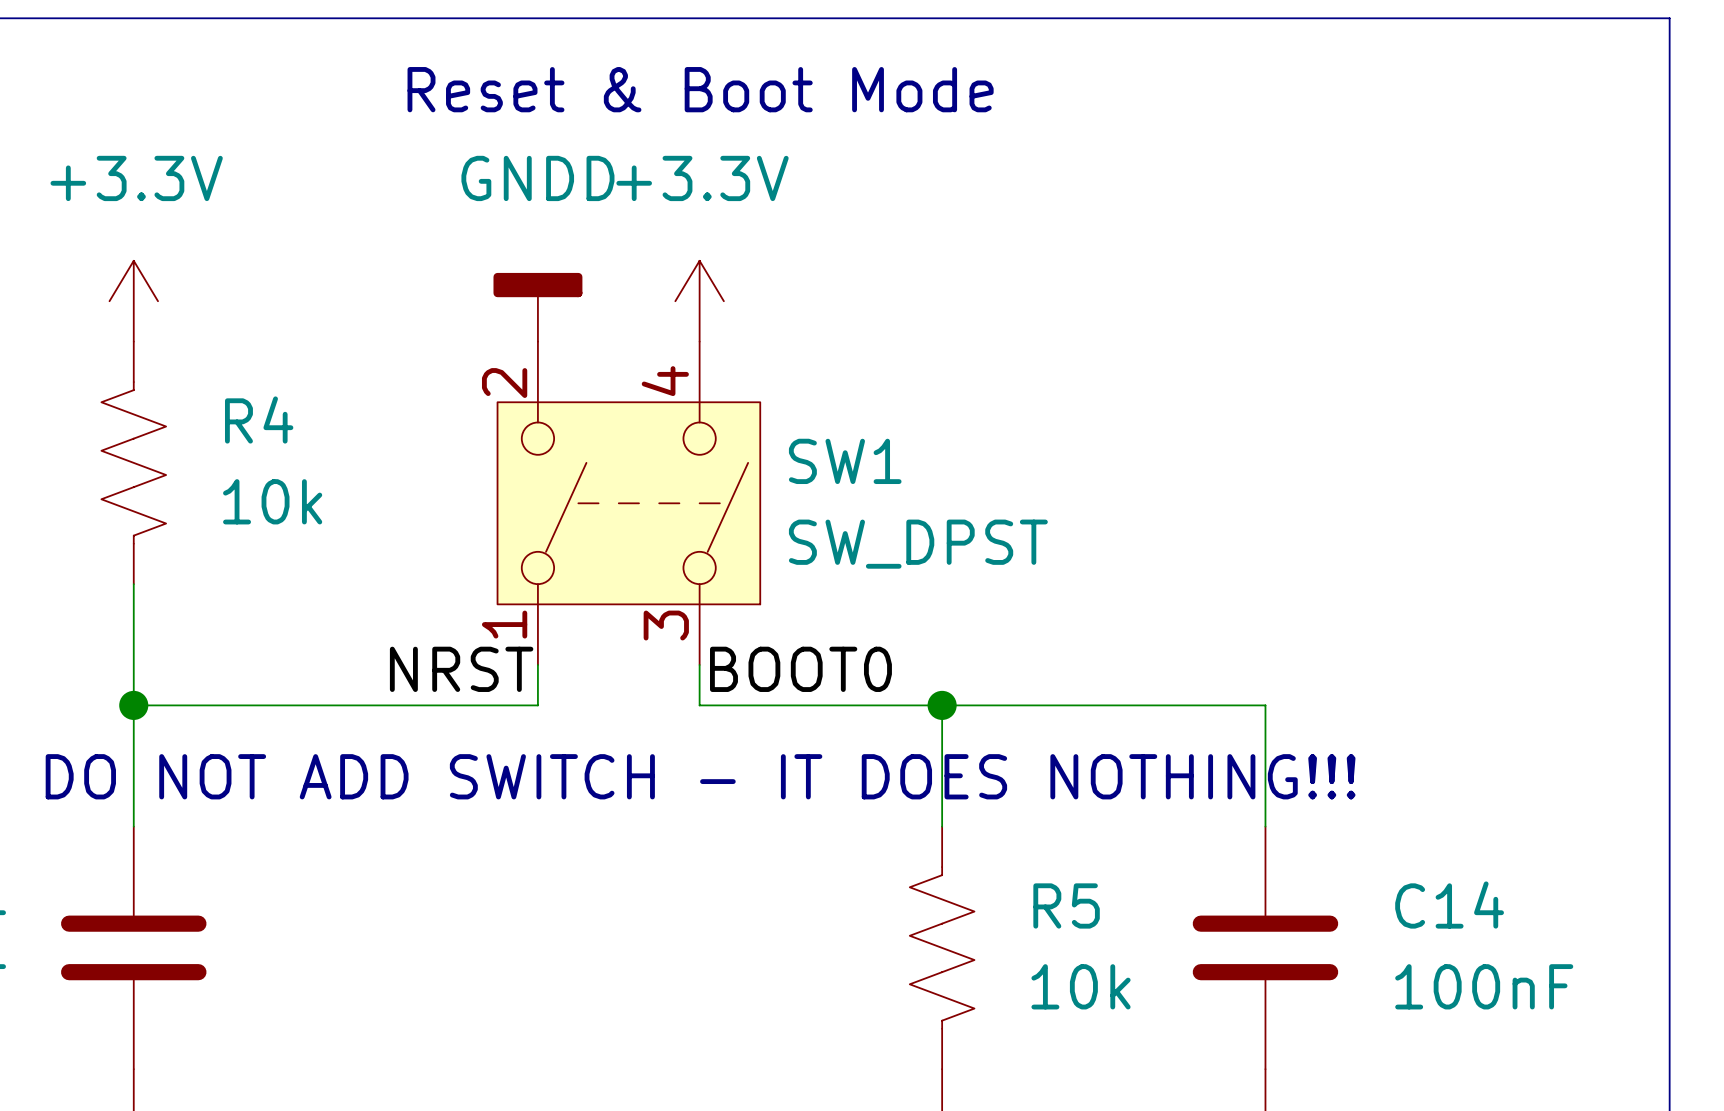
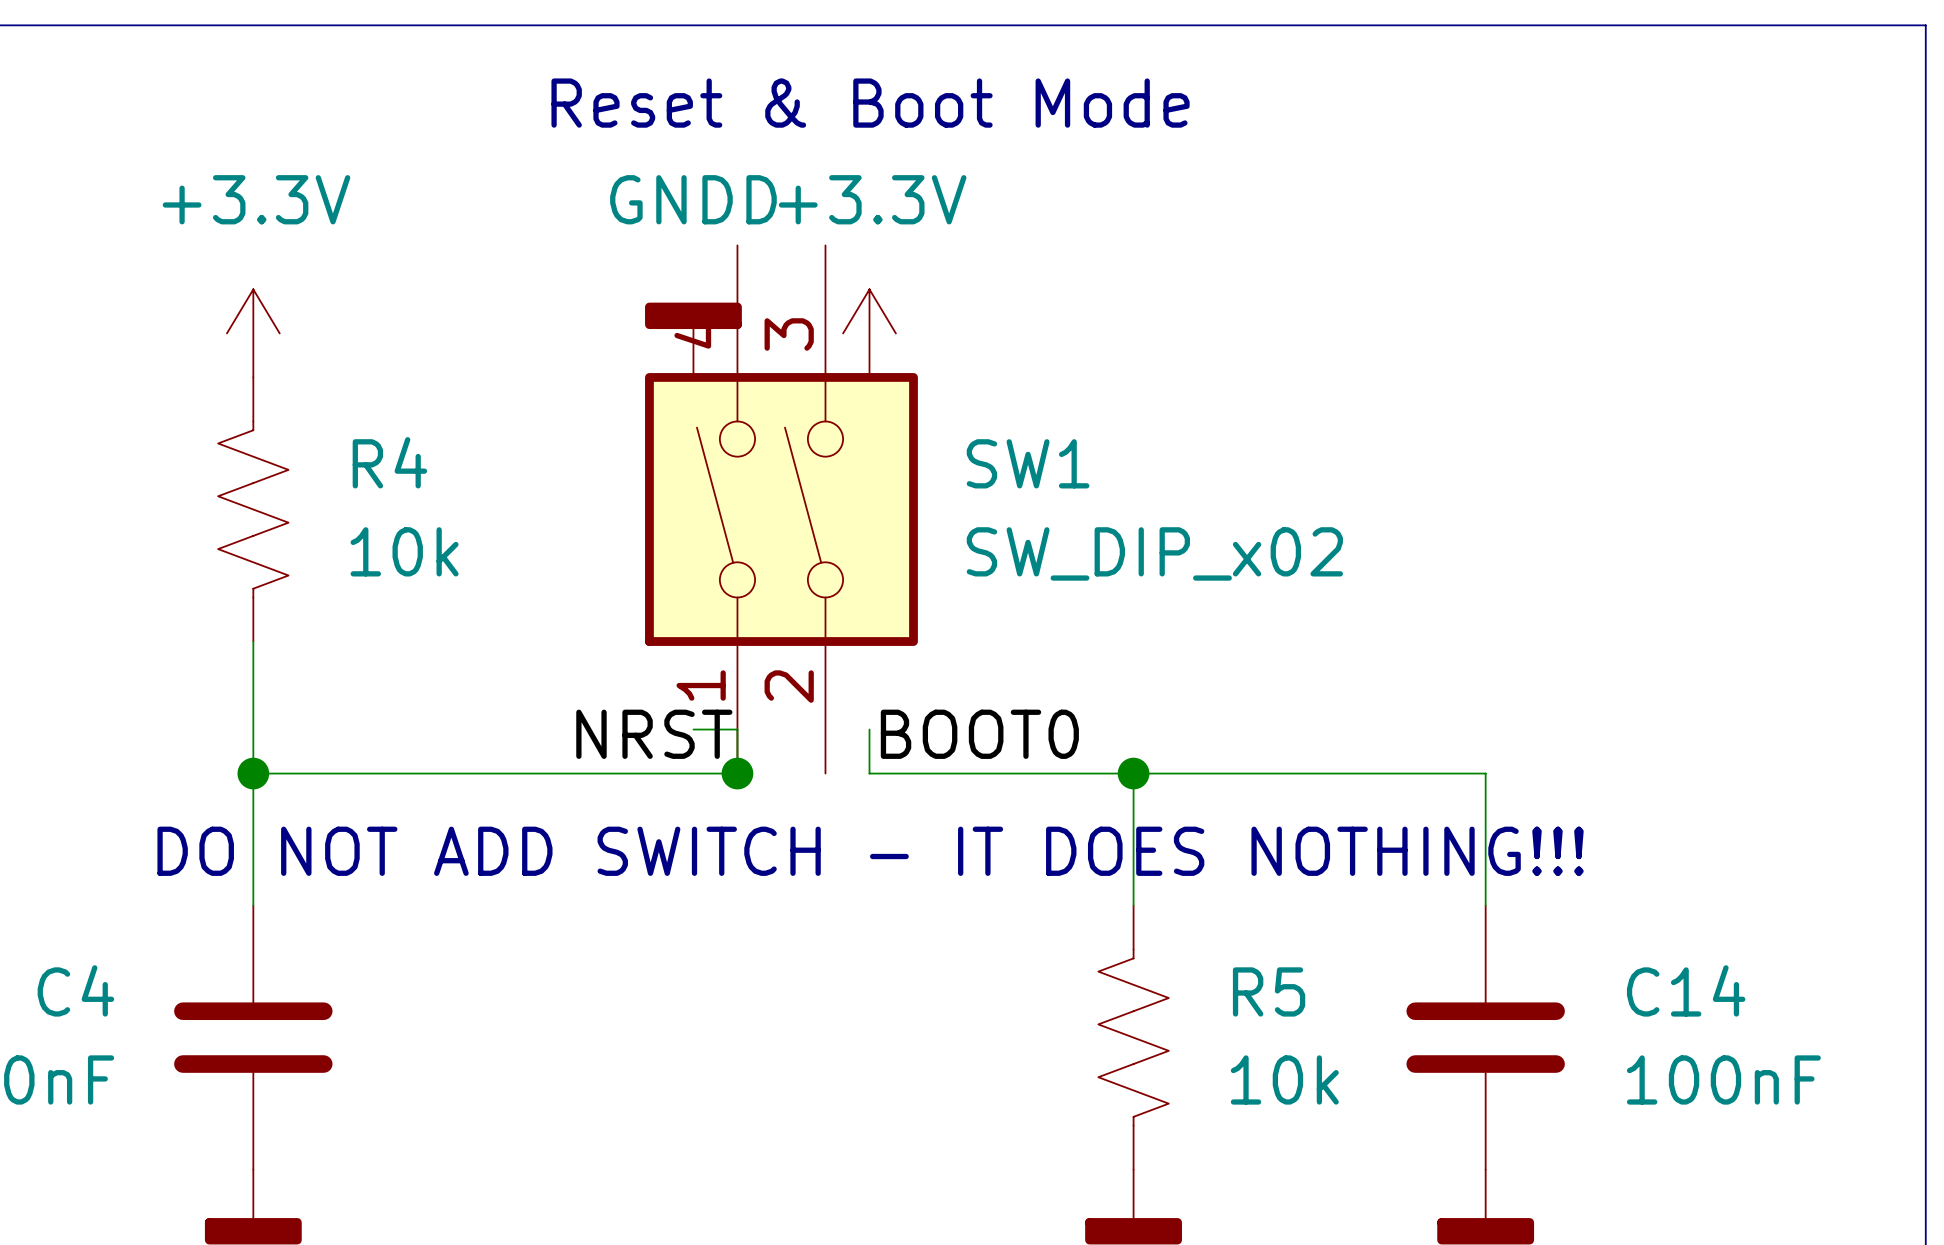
SW1 symbol: [497, 341, 761, 665] -> [645, 245, 918, 774]
SW1 value: SW_DPST (918, 544) -> SW_DIP_x02 (1154, 553)
wire: (537, 664) (537, 705) -> (693, 729) (737, 729) (737, 773) (693, 773)
label position: NRST (461, 669) -> NRST (654, 734)
junction: none -> (737, 773)

